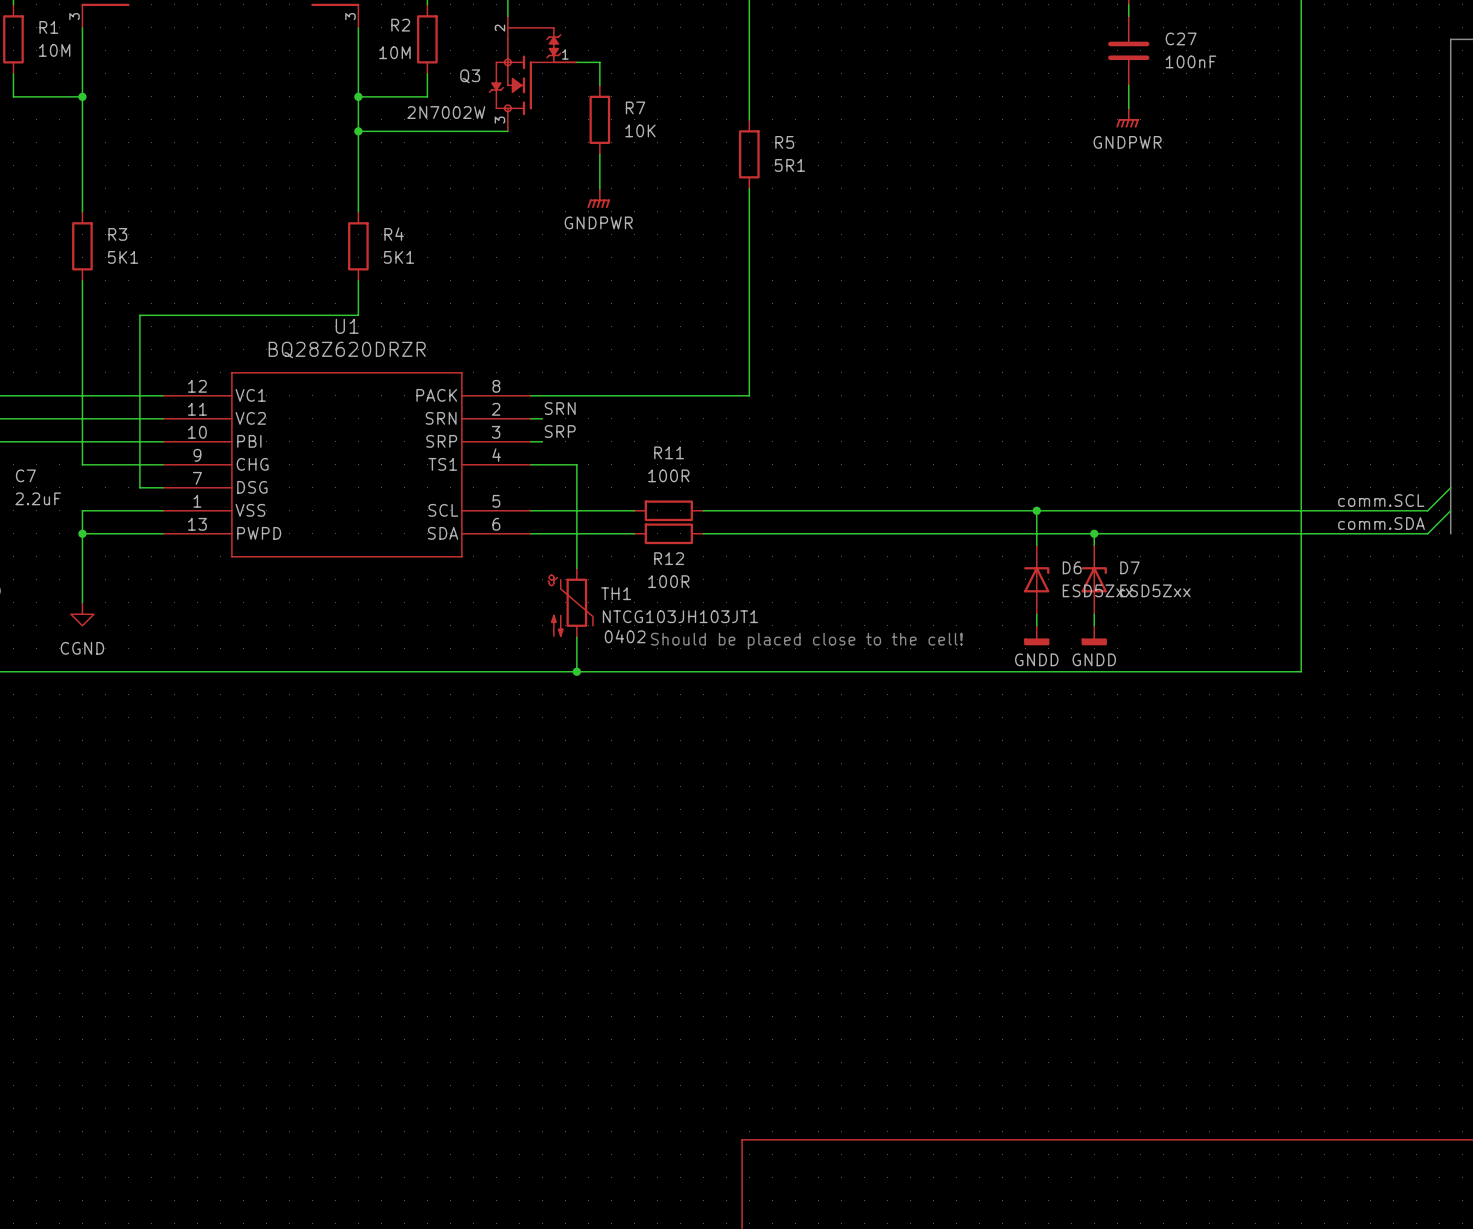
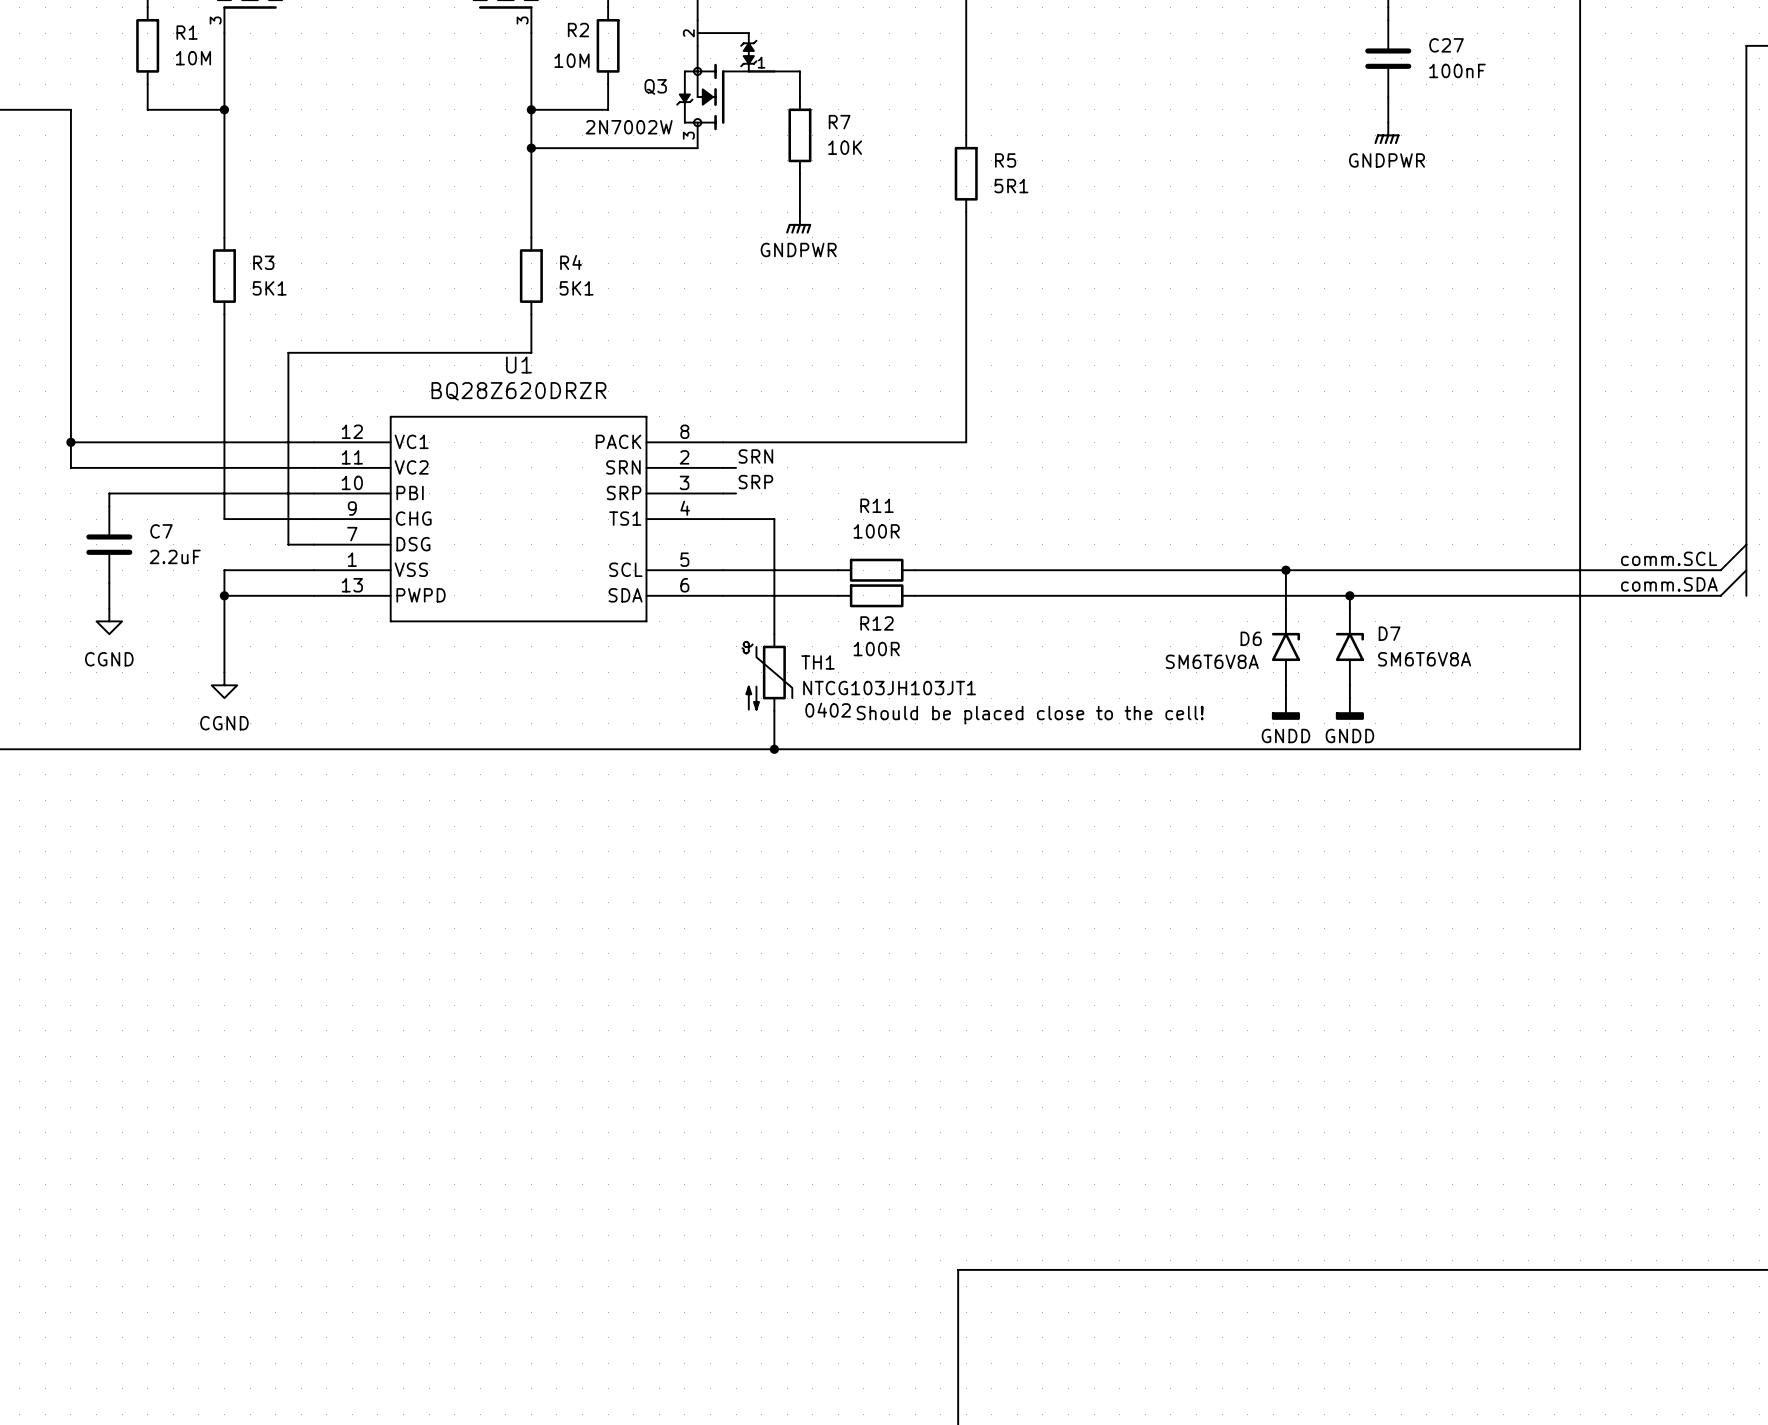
D6 symbol: [1024, 545, 1050, 615] -> [1271, 608, 1301, 686]
D7 symbol: [1081, 545, 1107, 615] -> [1335, 608, 1364, 686]
D6 name position: D6 (1072, 567) -> D6 (1251, 638)
D6 value: ESD5Zxx (1097, 590) -> SM6T6V8A (1212, 661)
D7 value: ESD5Zxx (1155, 590) -> SM6T6V8A (1424, 659)

